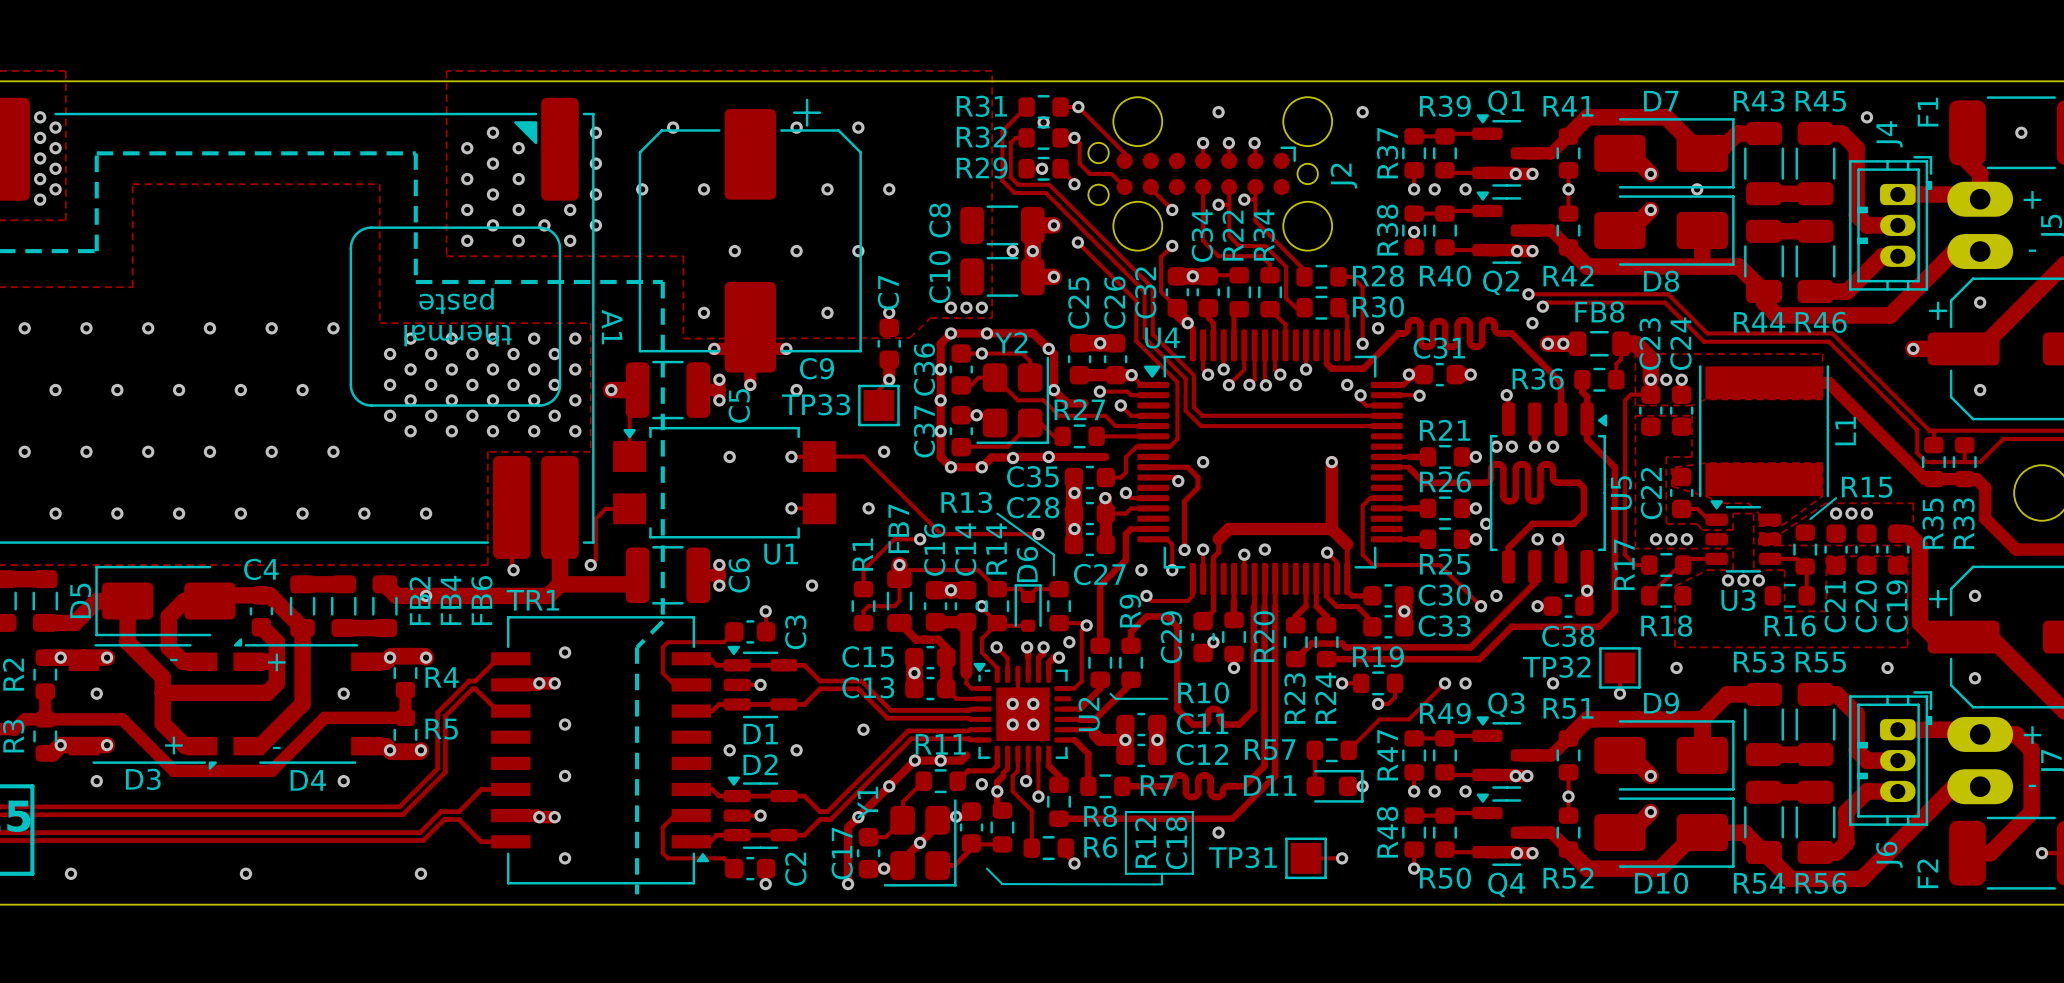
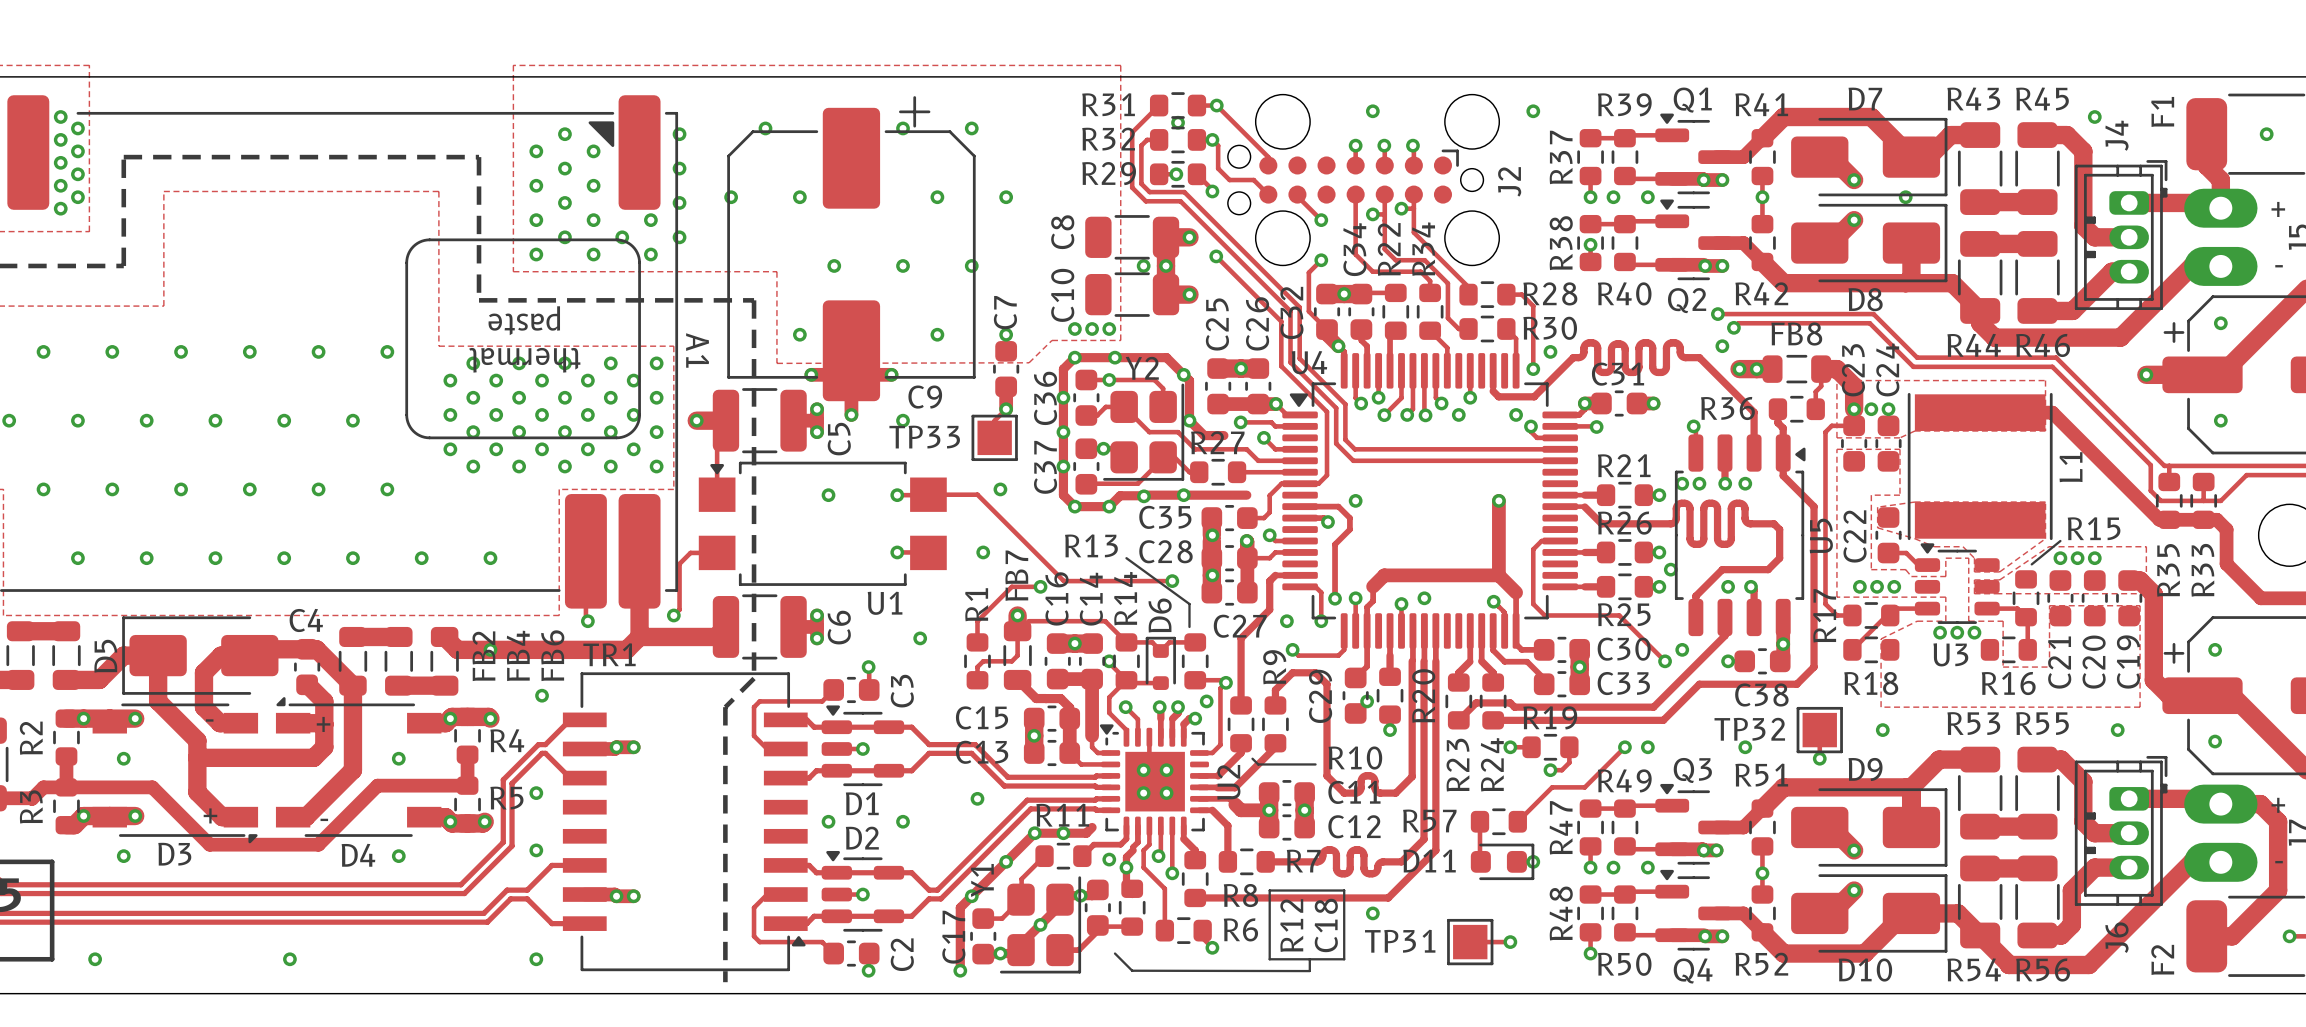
via: none -> (542, 695)
via: (565, 652) -> none
via: none -> (536, 793)
via: (565, 724) -> none
via: none -> (536, 850)
via: (565, 776) -> none
via: (565, 858) -> none
via position: (420, 873) -> (536, 959)

